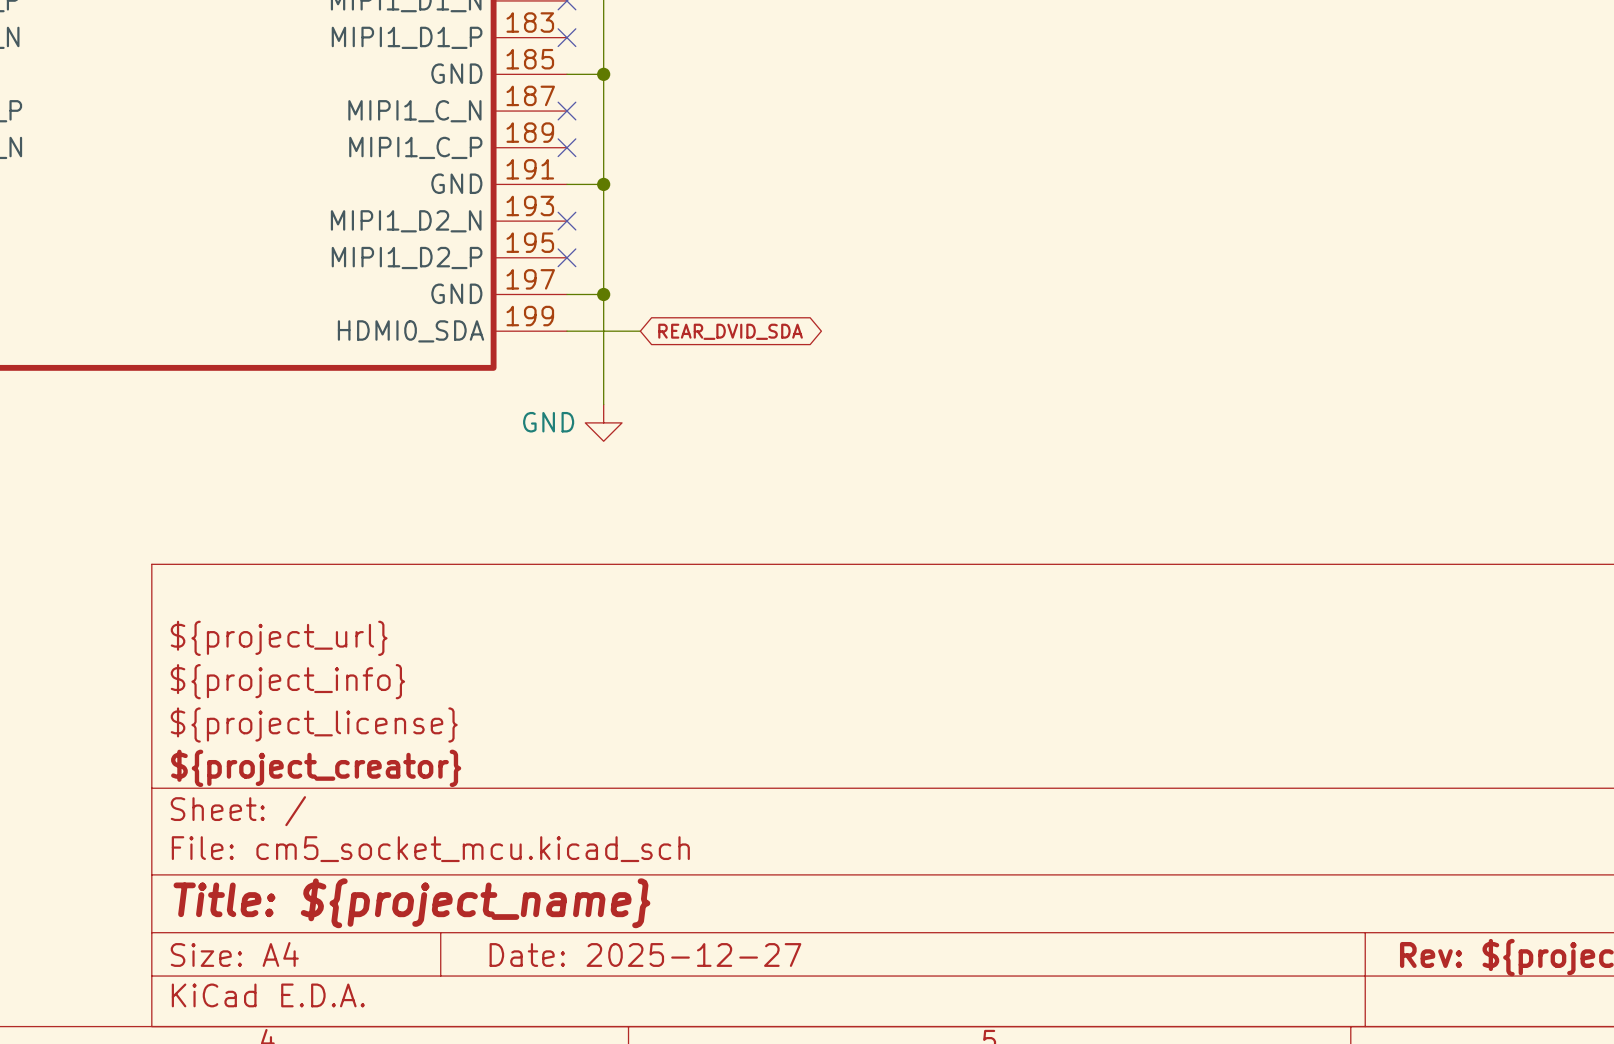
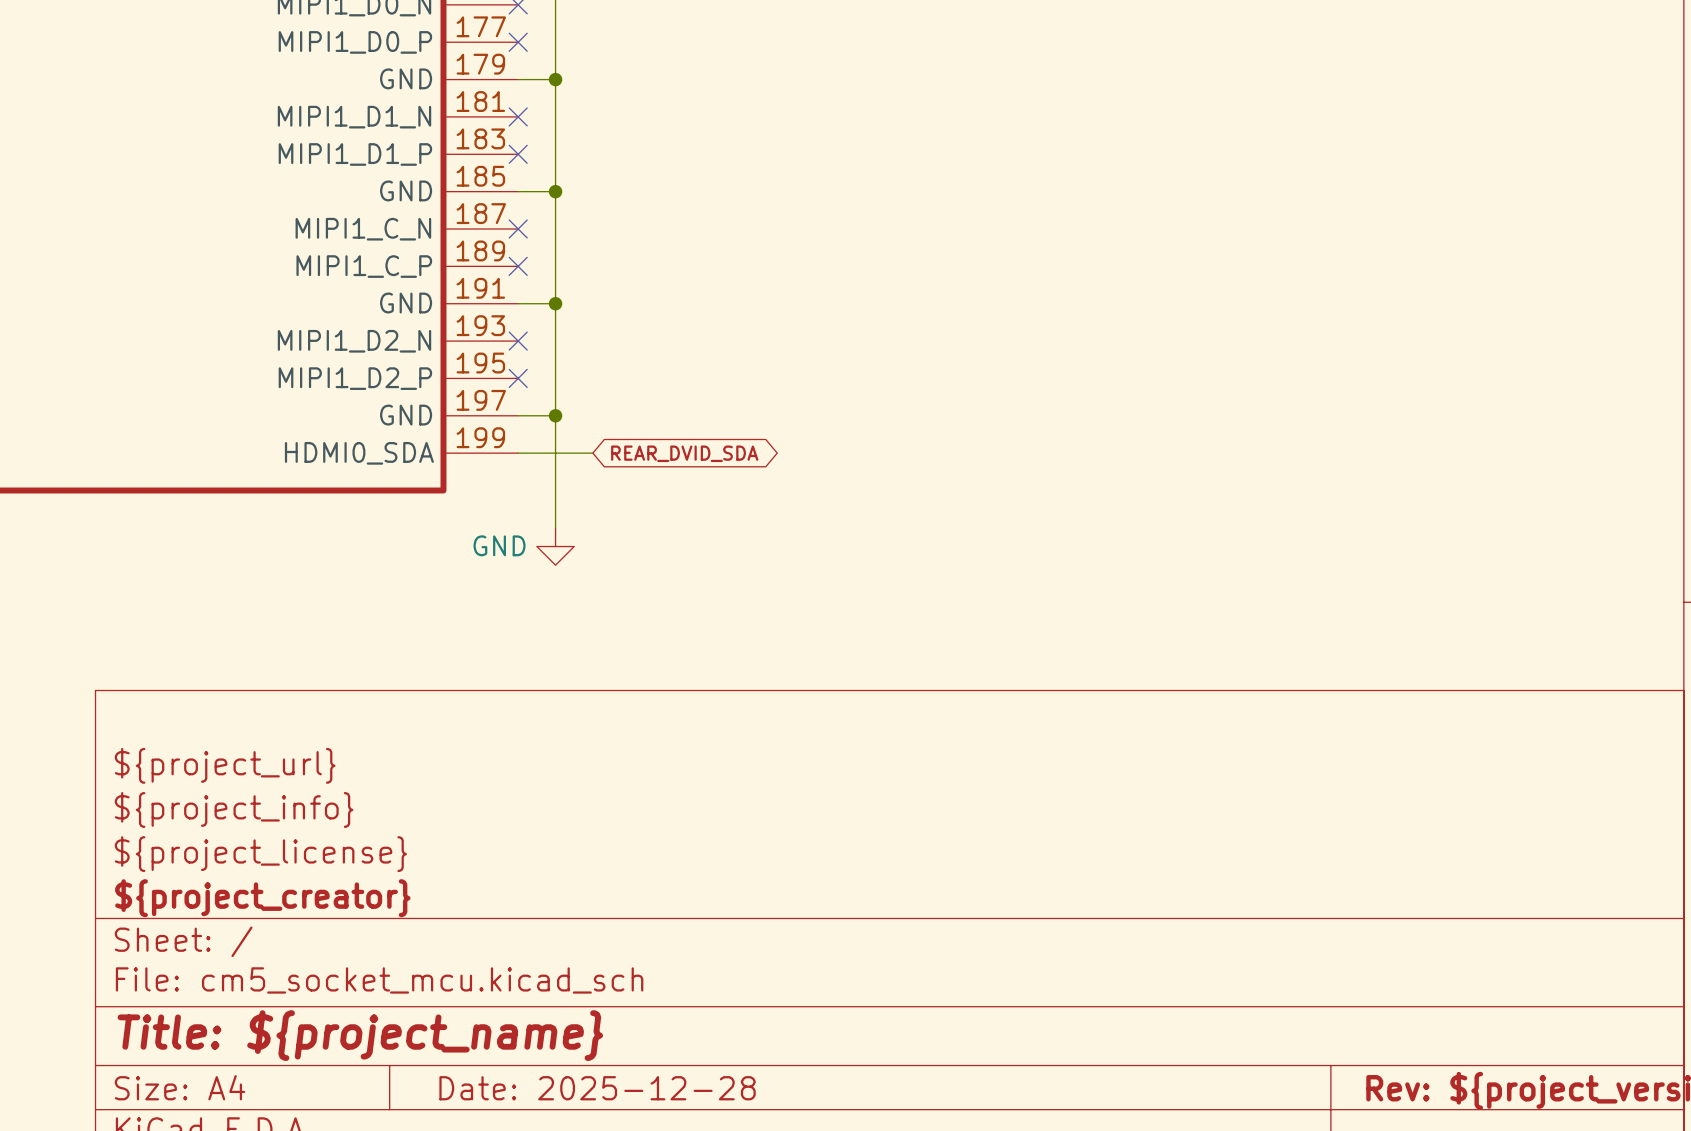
title block: Date: 2025-12-27 (645, 954) -> Date: 2025-12-28 (597, 1088)

